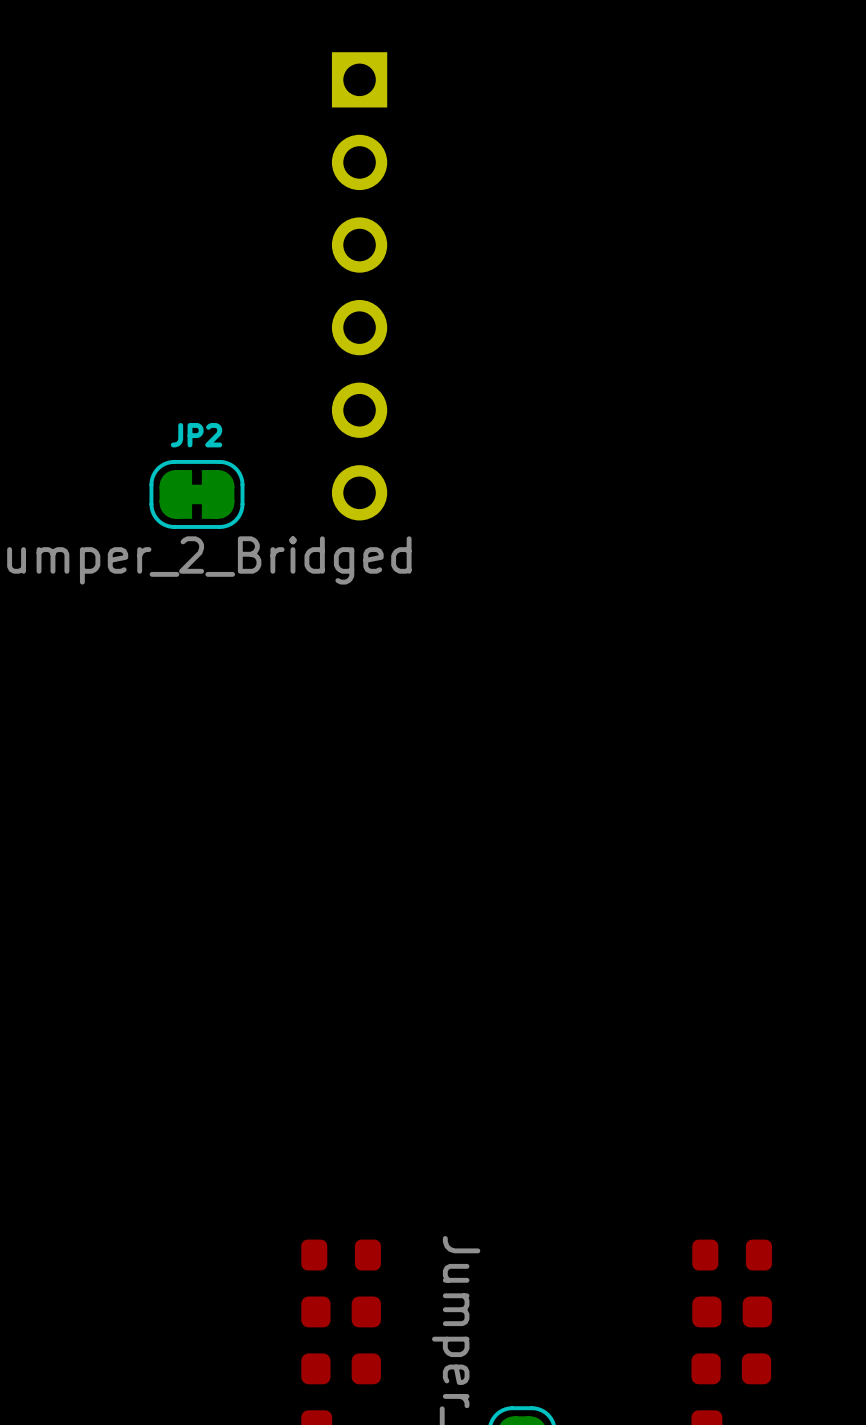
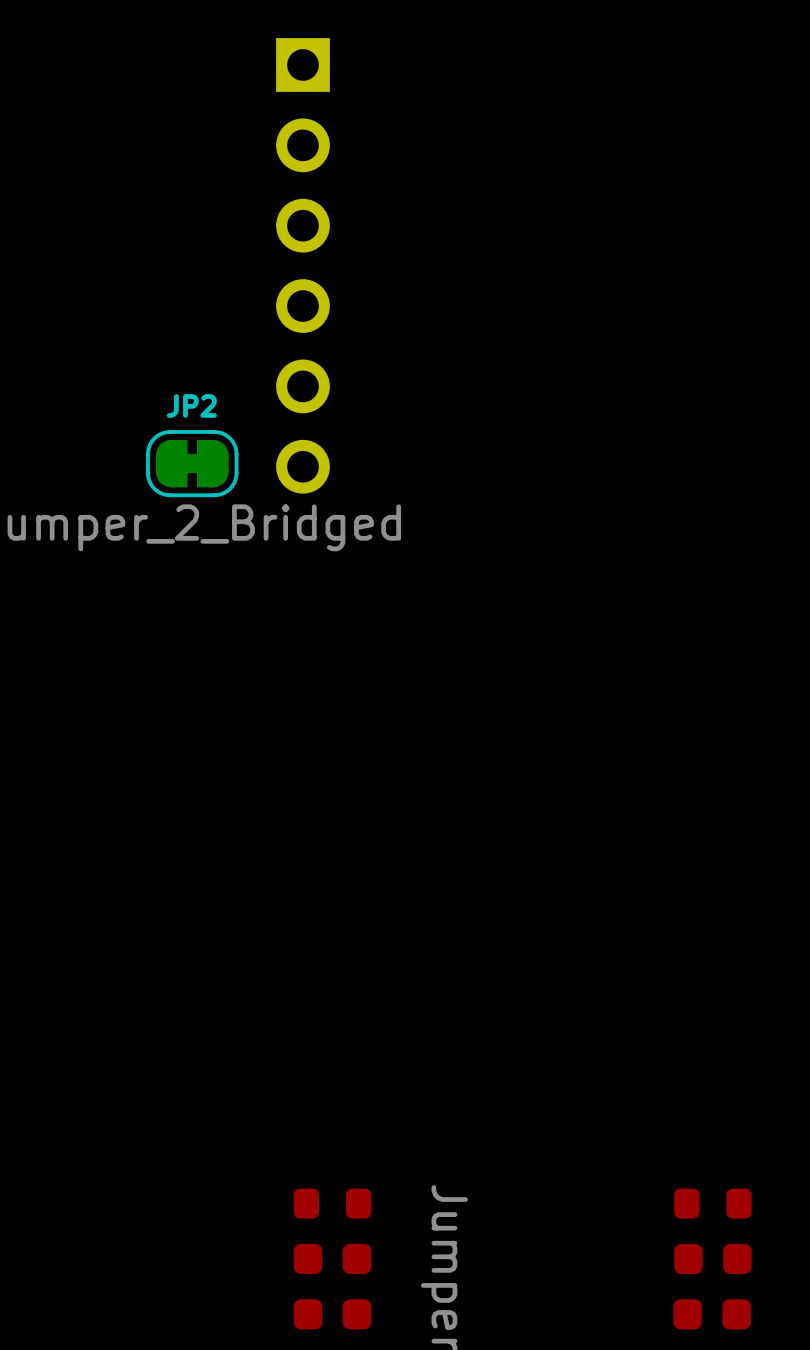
part position: (359, 286) -> (302, 265)

